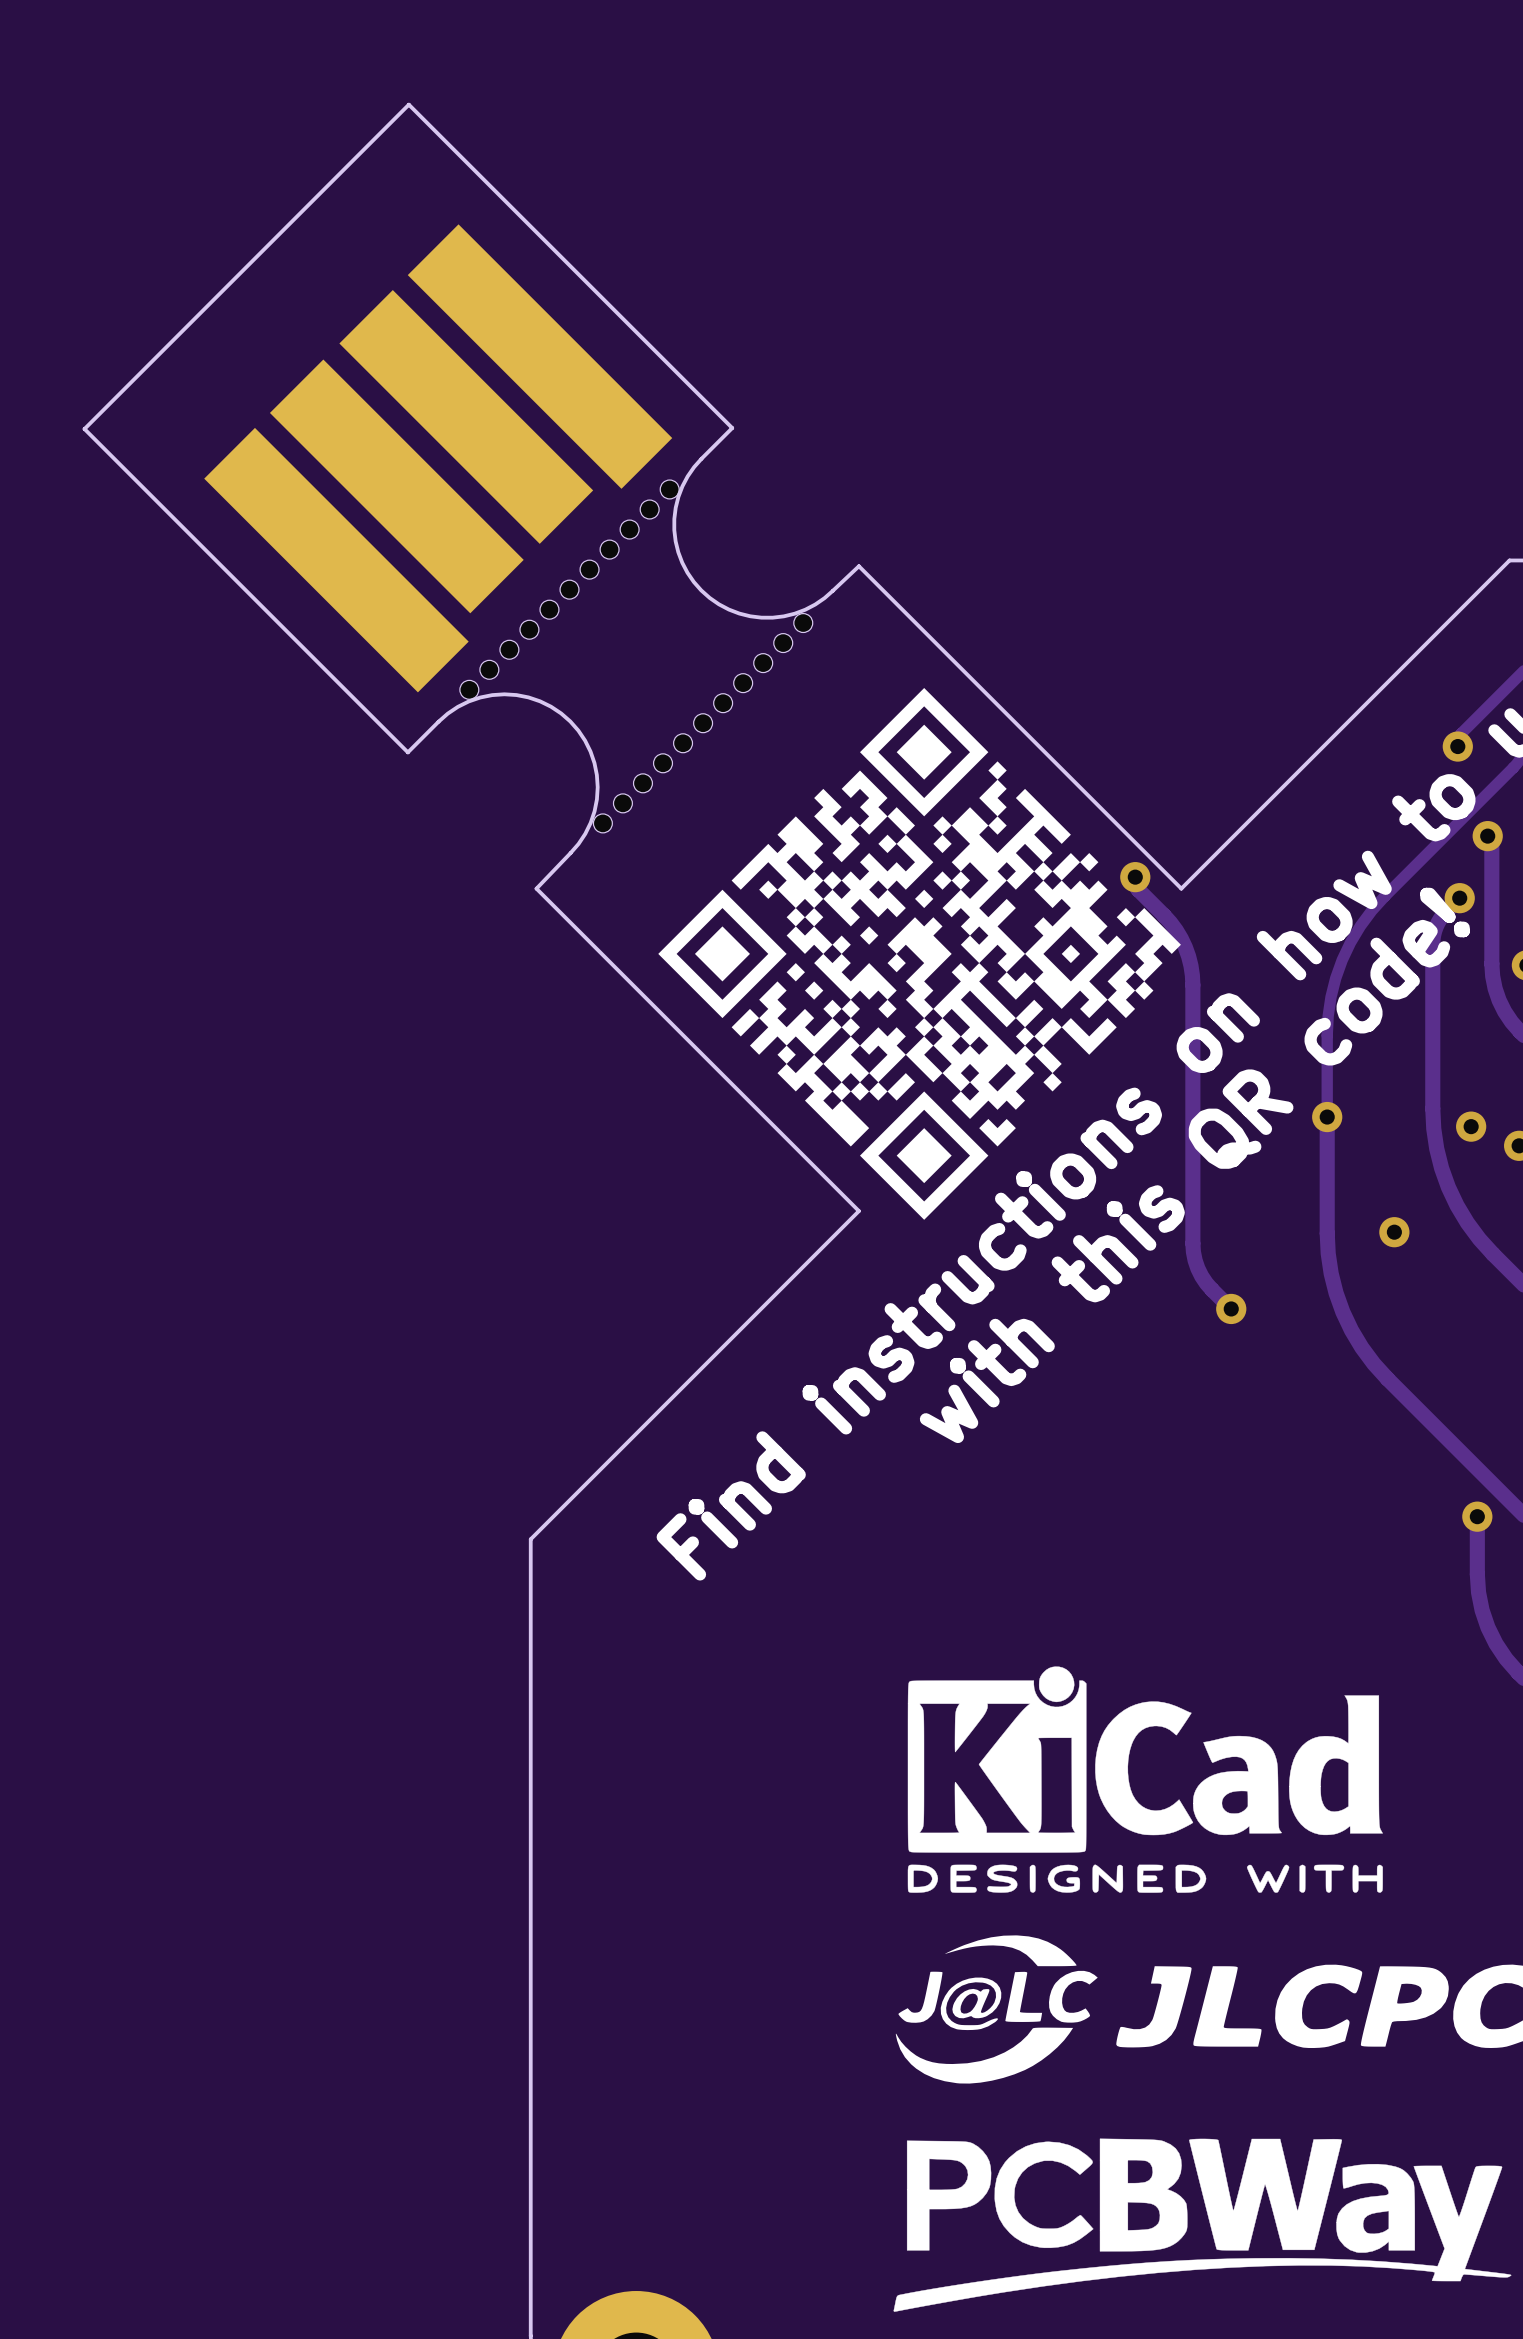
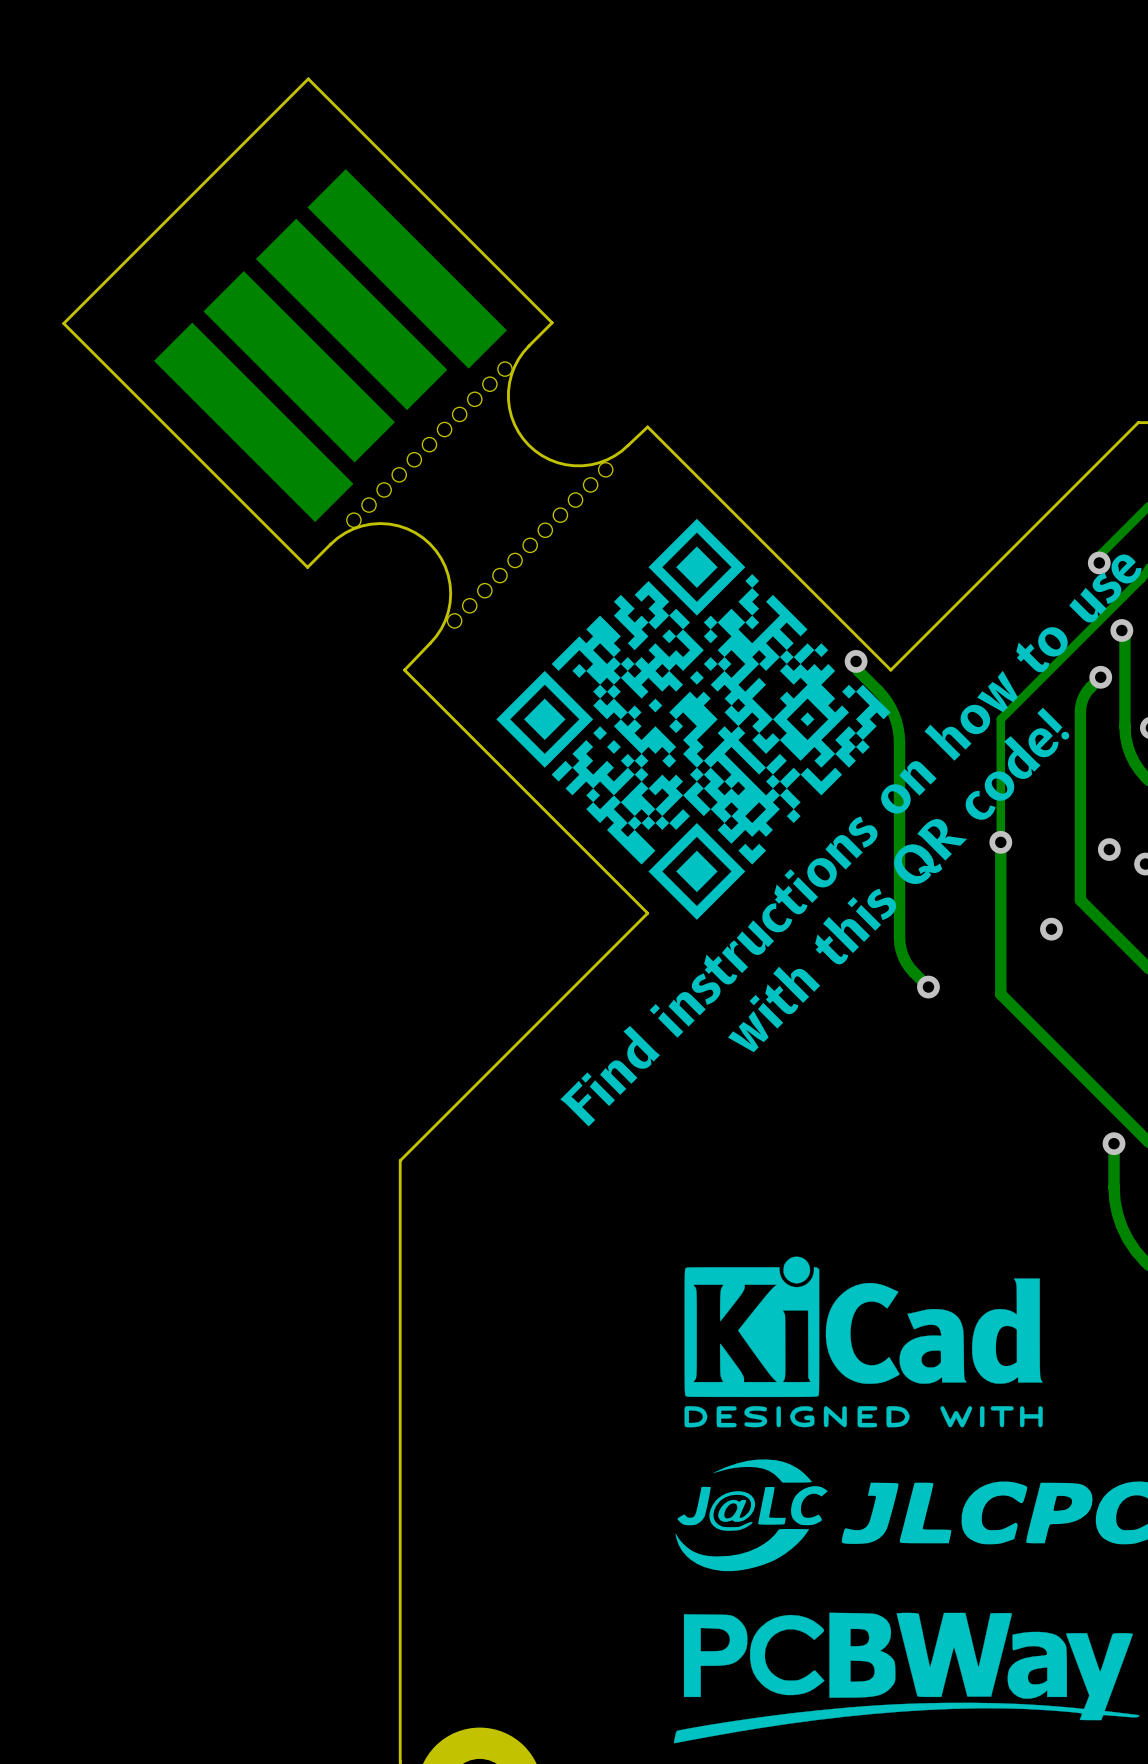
track: (1384, 896) (1360, 926) (1342, 960) (1330, 997) (1327, 1035) -> (1044, 675) (1000, 719) (1000, 780)
track: (1432, 1108) (1436, 1148) (1448, 1187) (1467, 1222) (1492, 1254) -> (1080, 836) (1080, 900) (1125, 945)
track: (1327, 1233) (1331, 1273) (1342, 1312) (1361, 1347) (1387, 1378) -> (1000, 930) (1000, 994) (1046, 1039)

